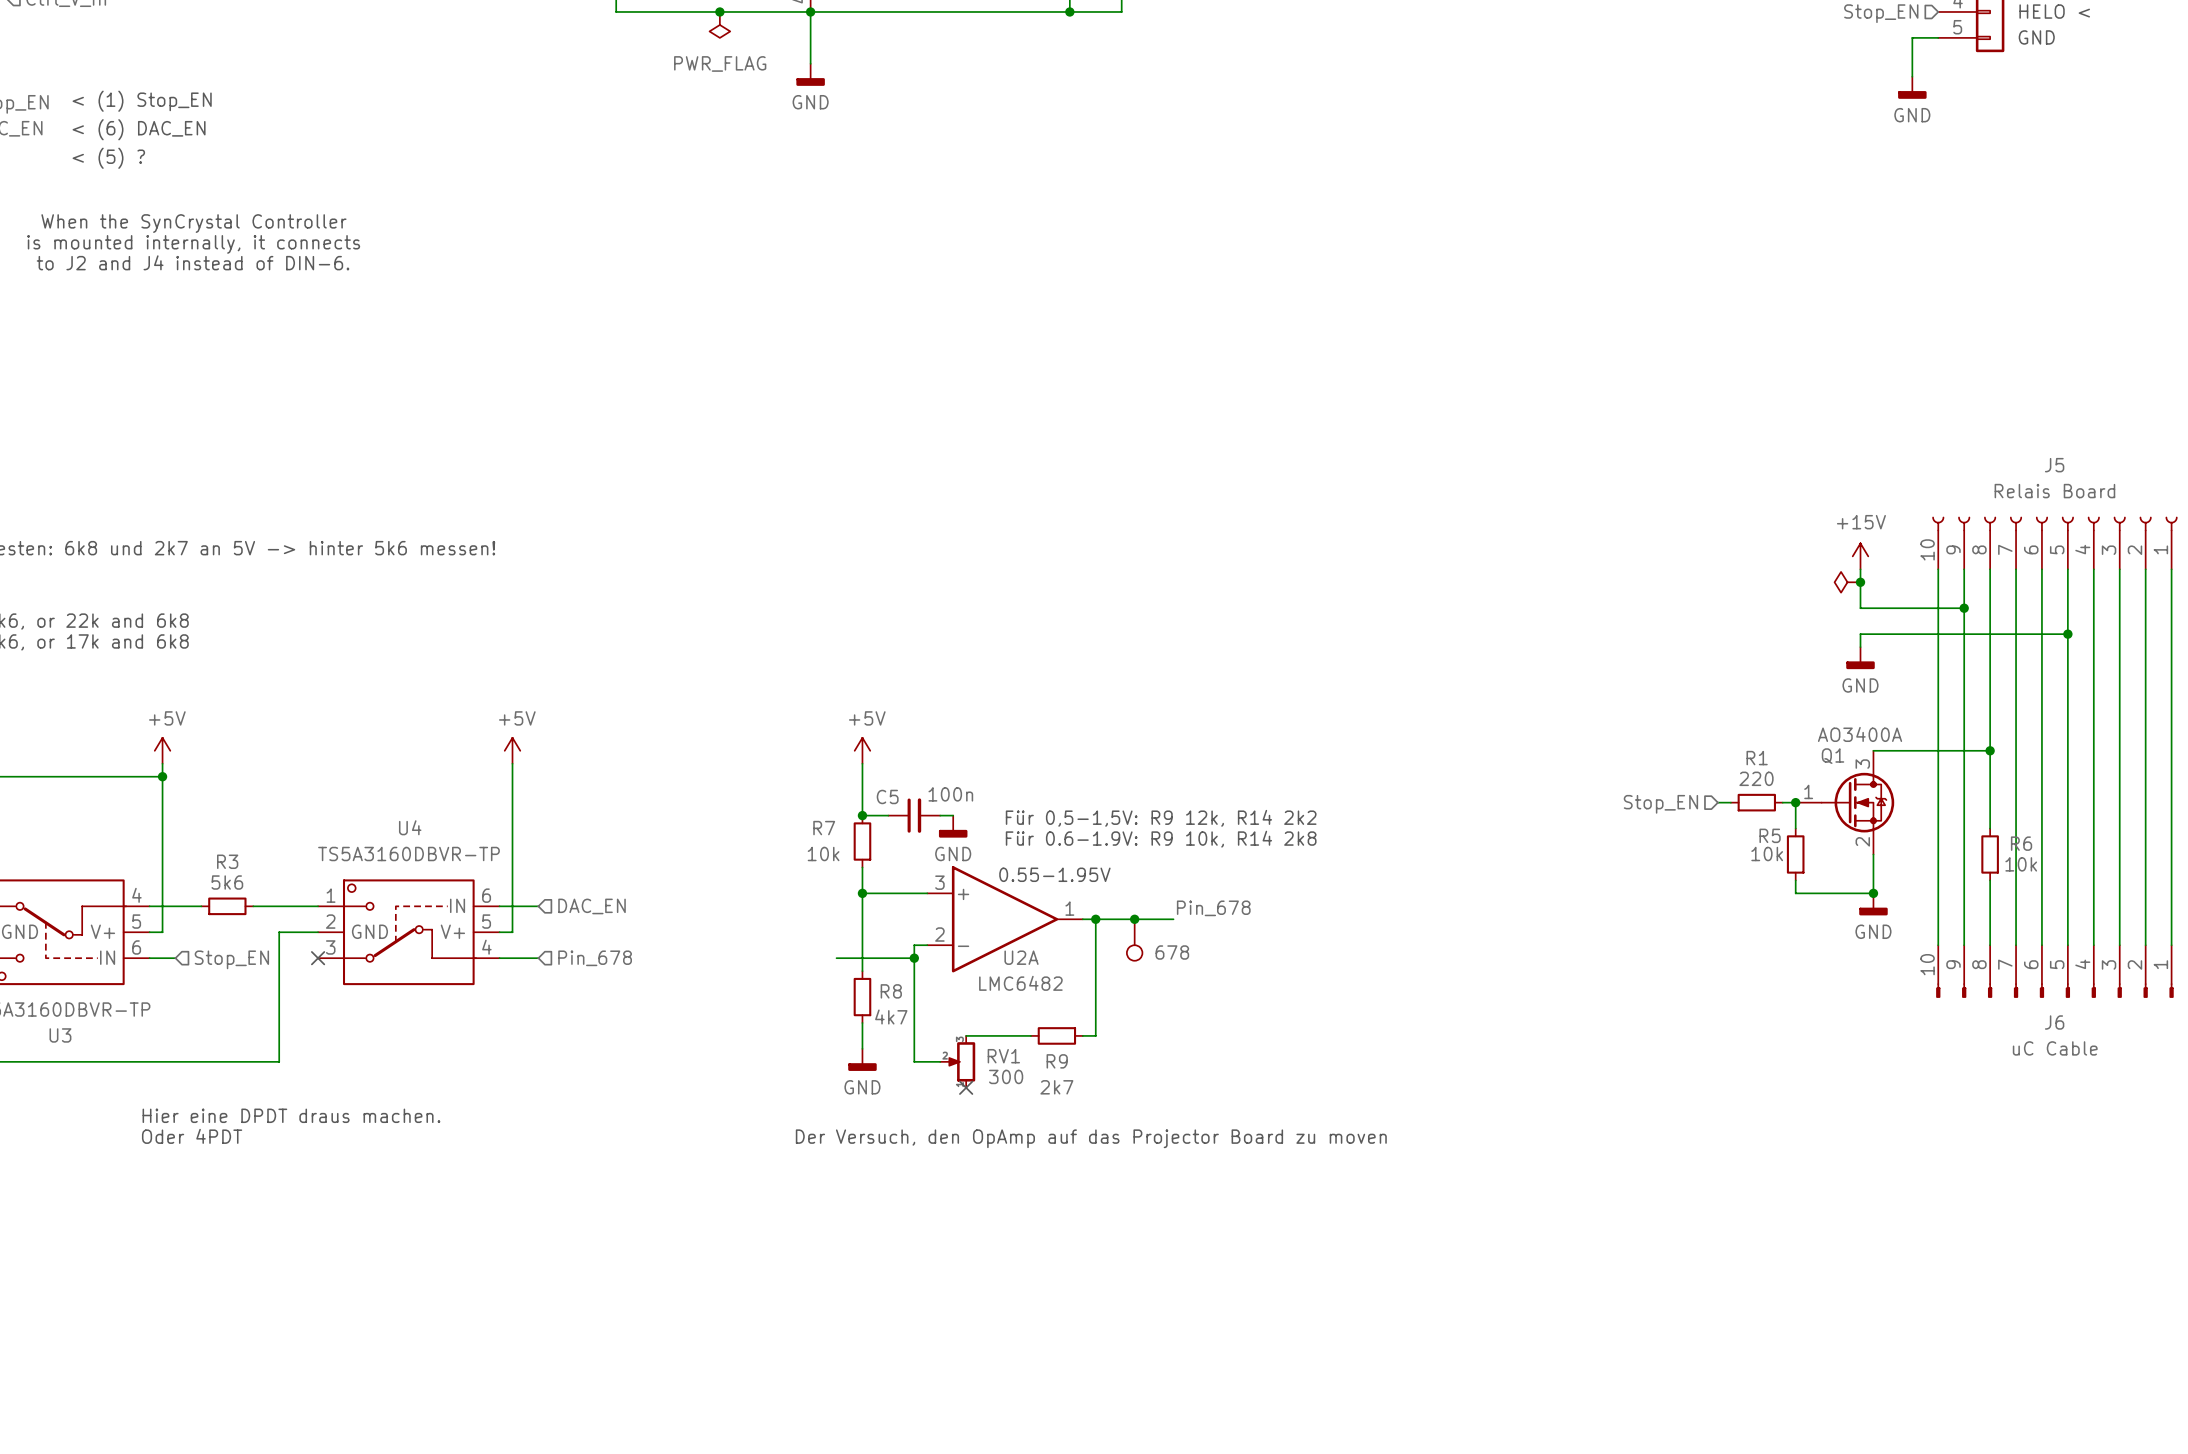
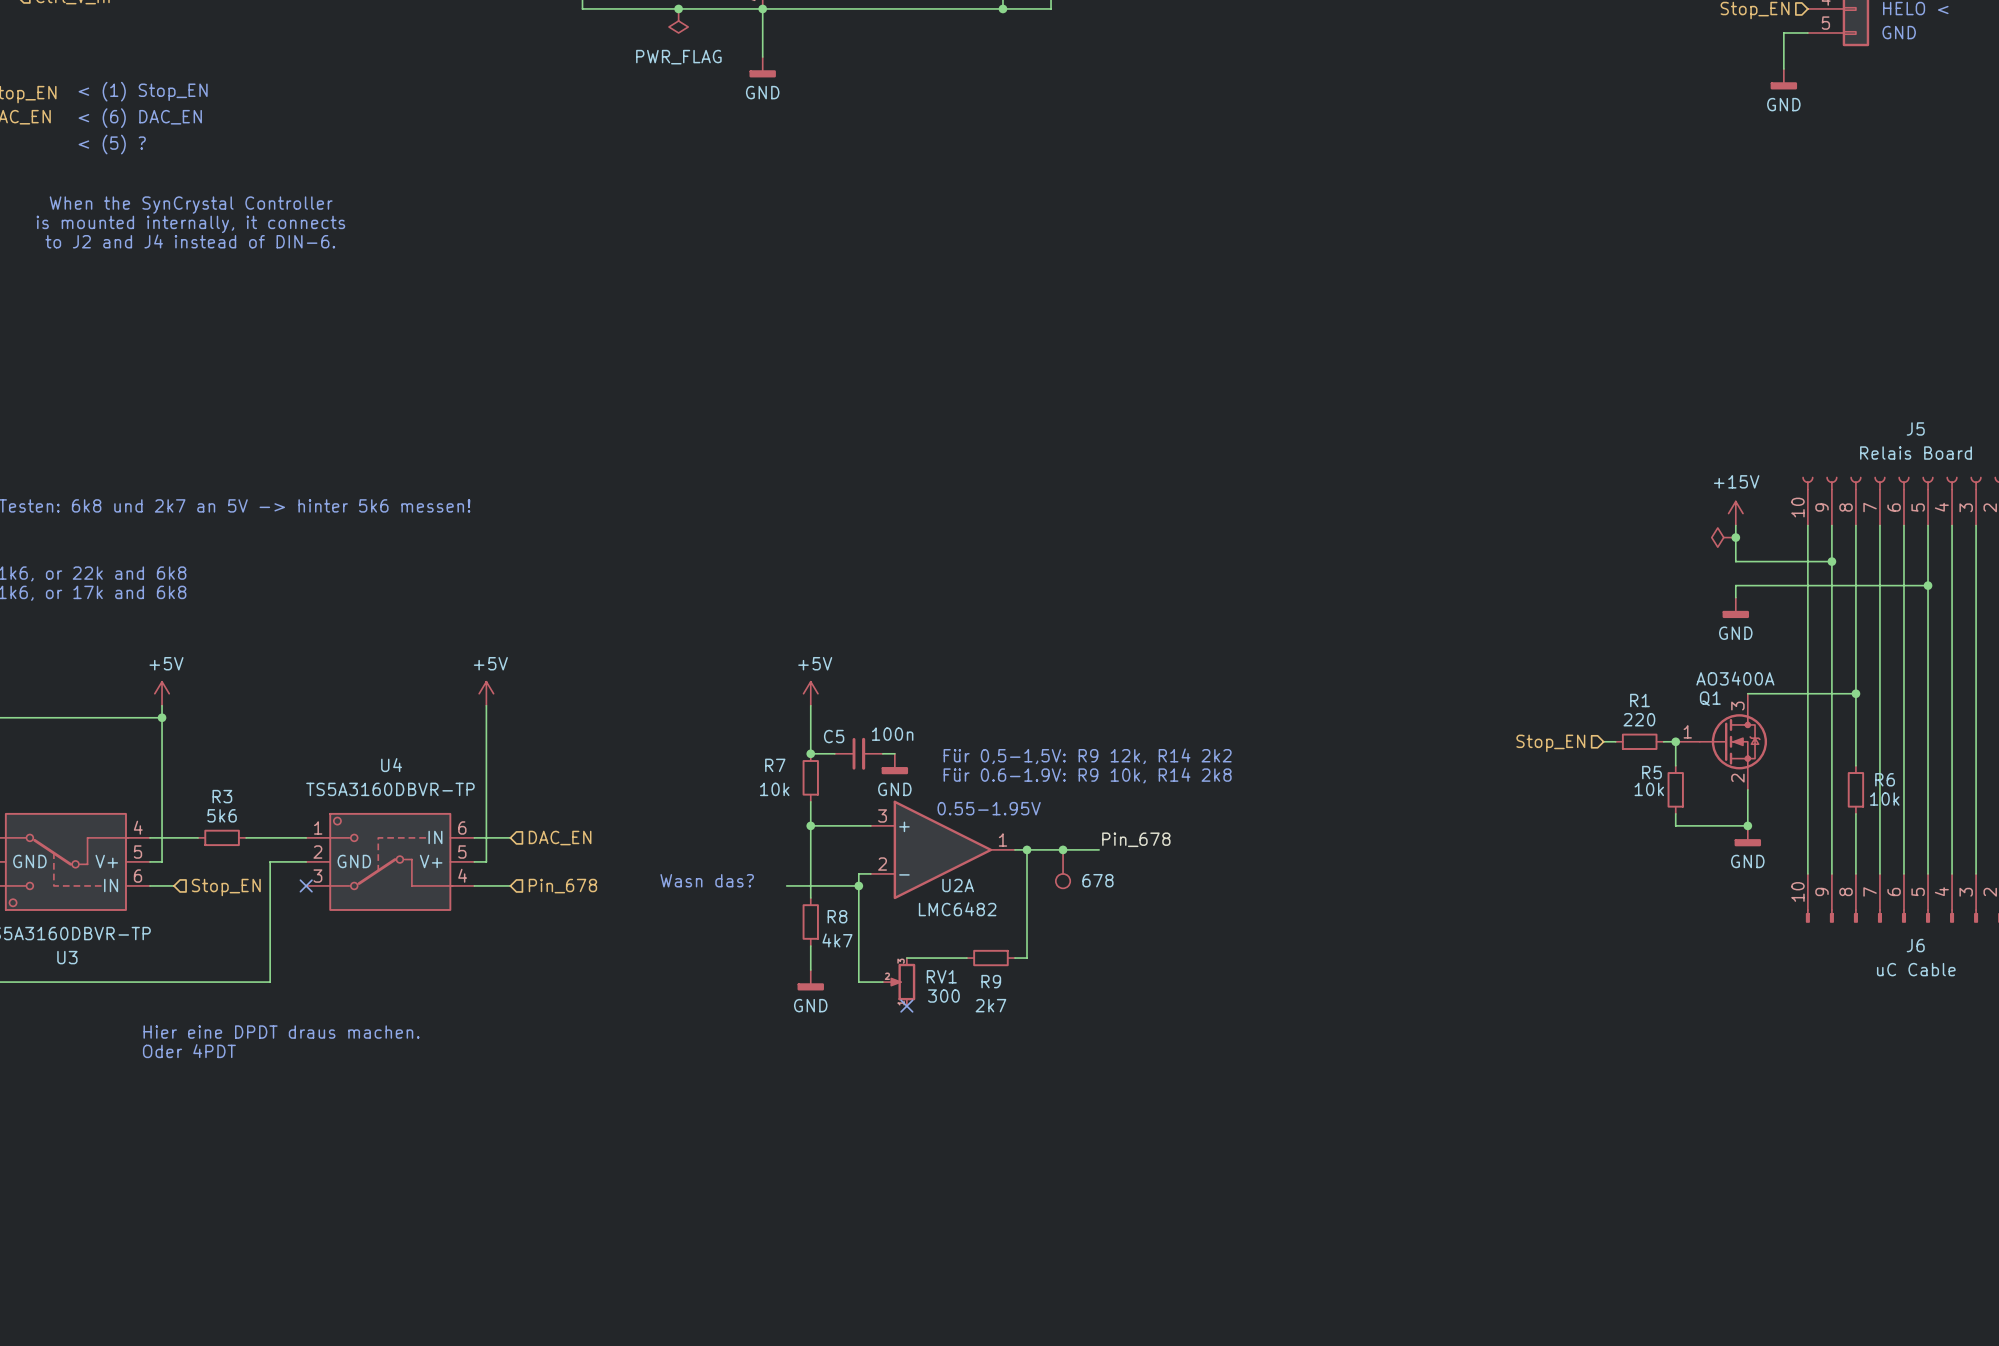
text: none -> Wasn das? (707, 880)
text: Der Versuch, den OpAmp auf das Projector Board zu moven (1091, 1138) -> none

